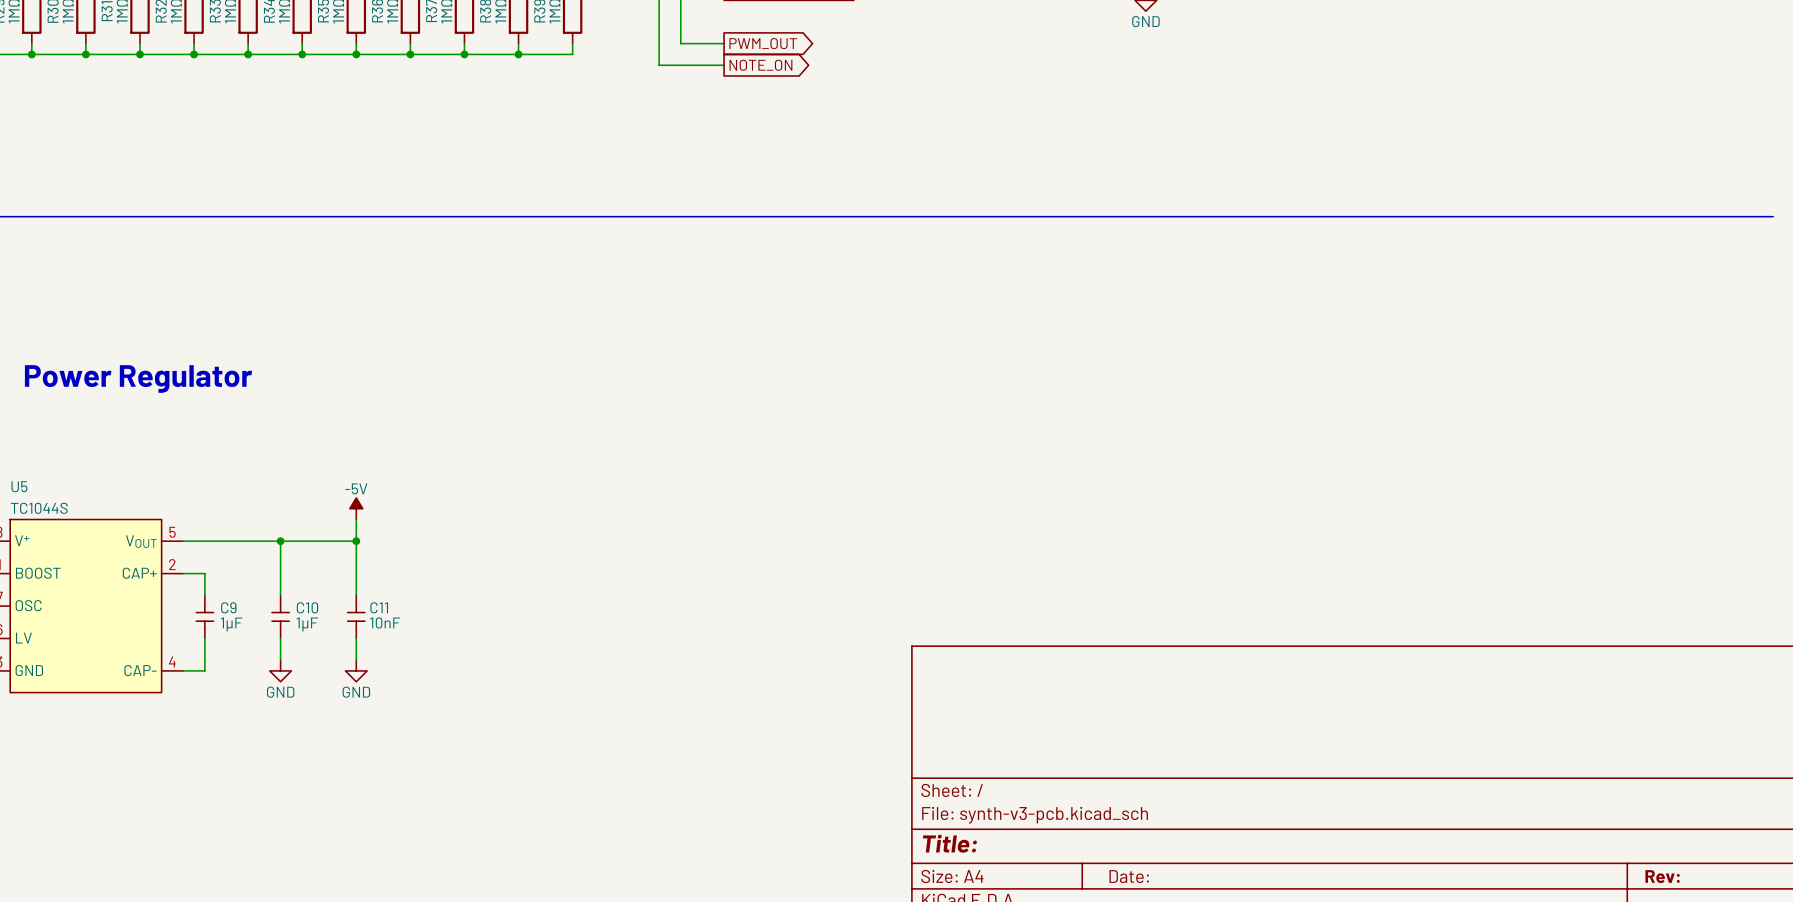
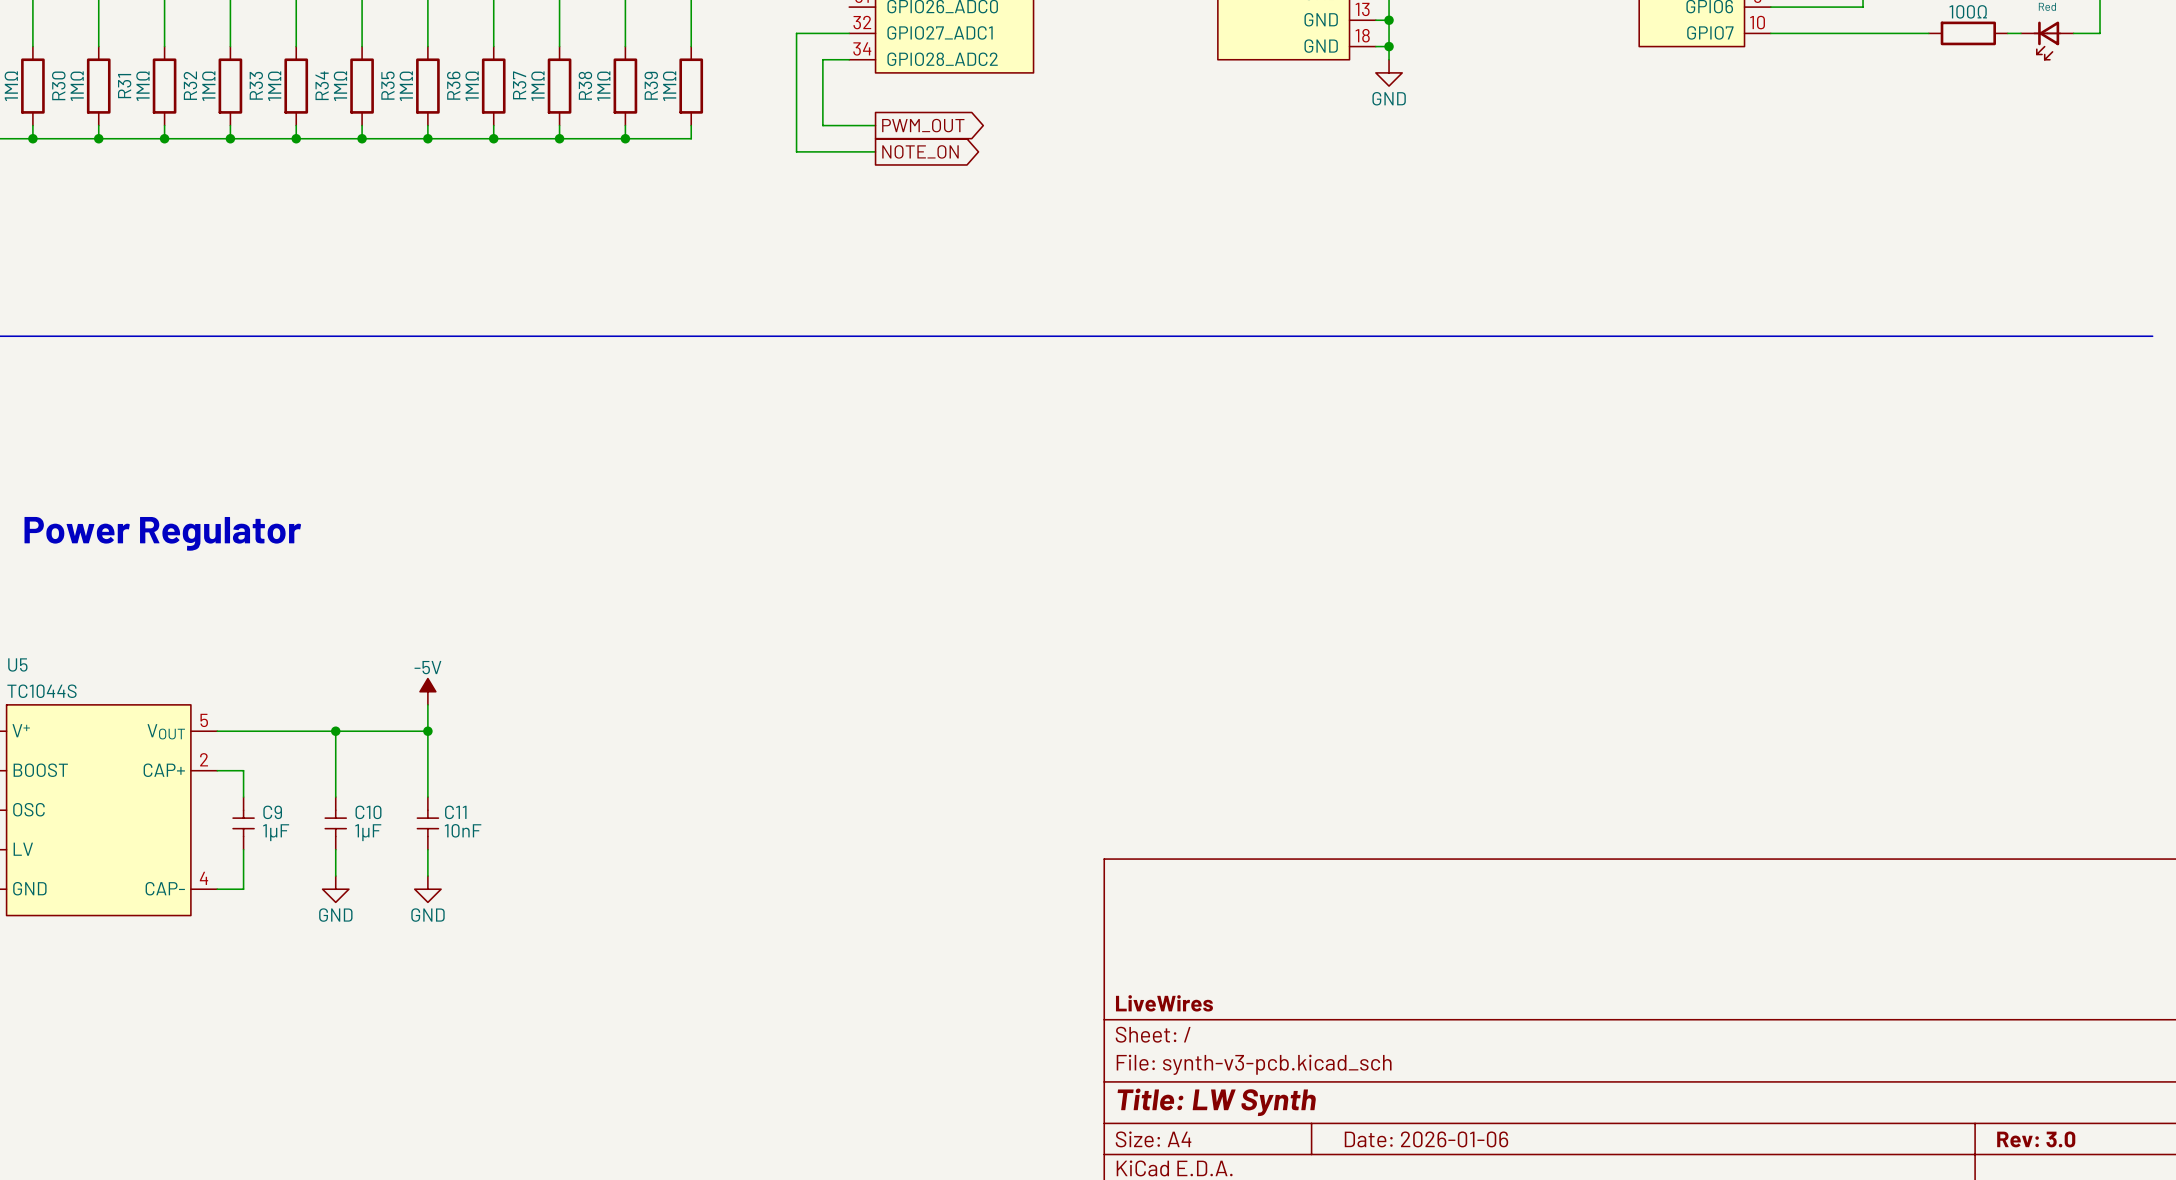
title block: none -> LiveWires (1164, 1003)
title block: Title: (949, 843) -> Title: LW Synth (1216, 1102)
title block: Date: (1129, 876) -> Date: 2026-01-06 (1426, 1139)
title block: Rev: (1662, 876) -> Rev: 3.0 (2036, 1139)

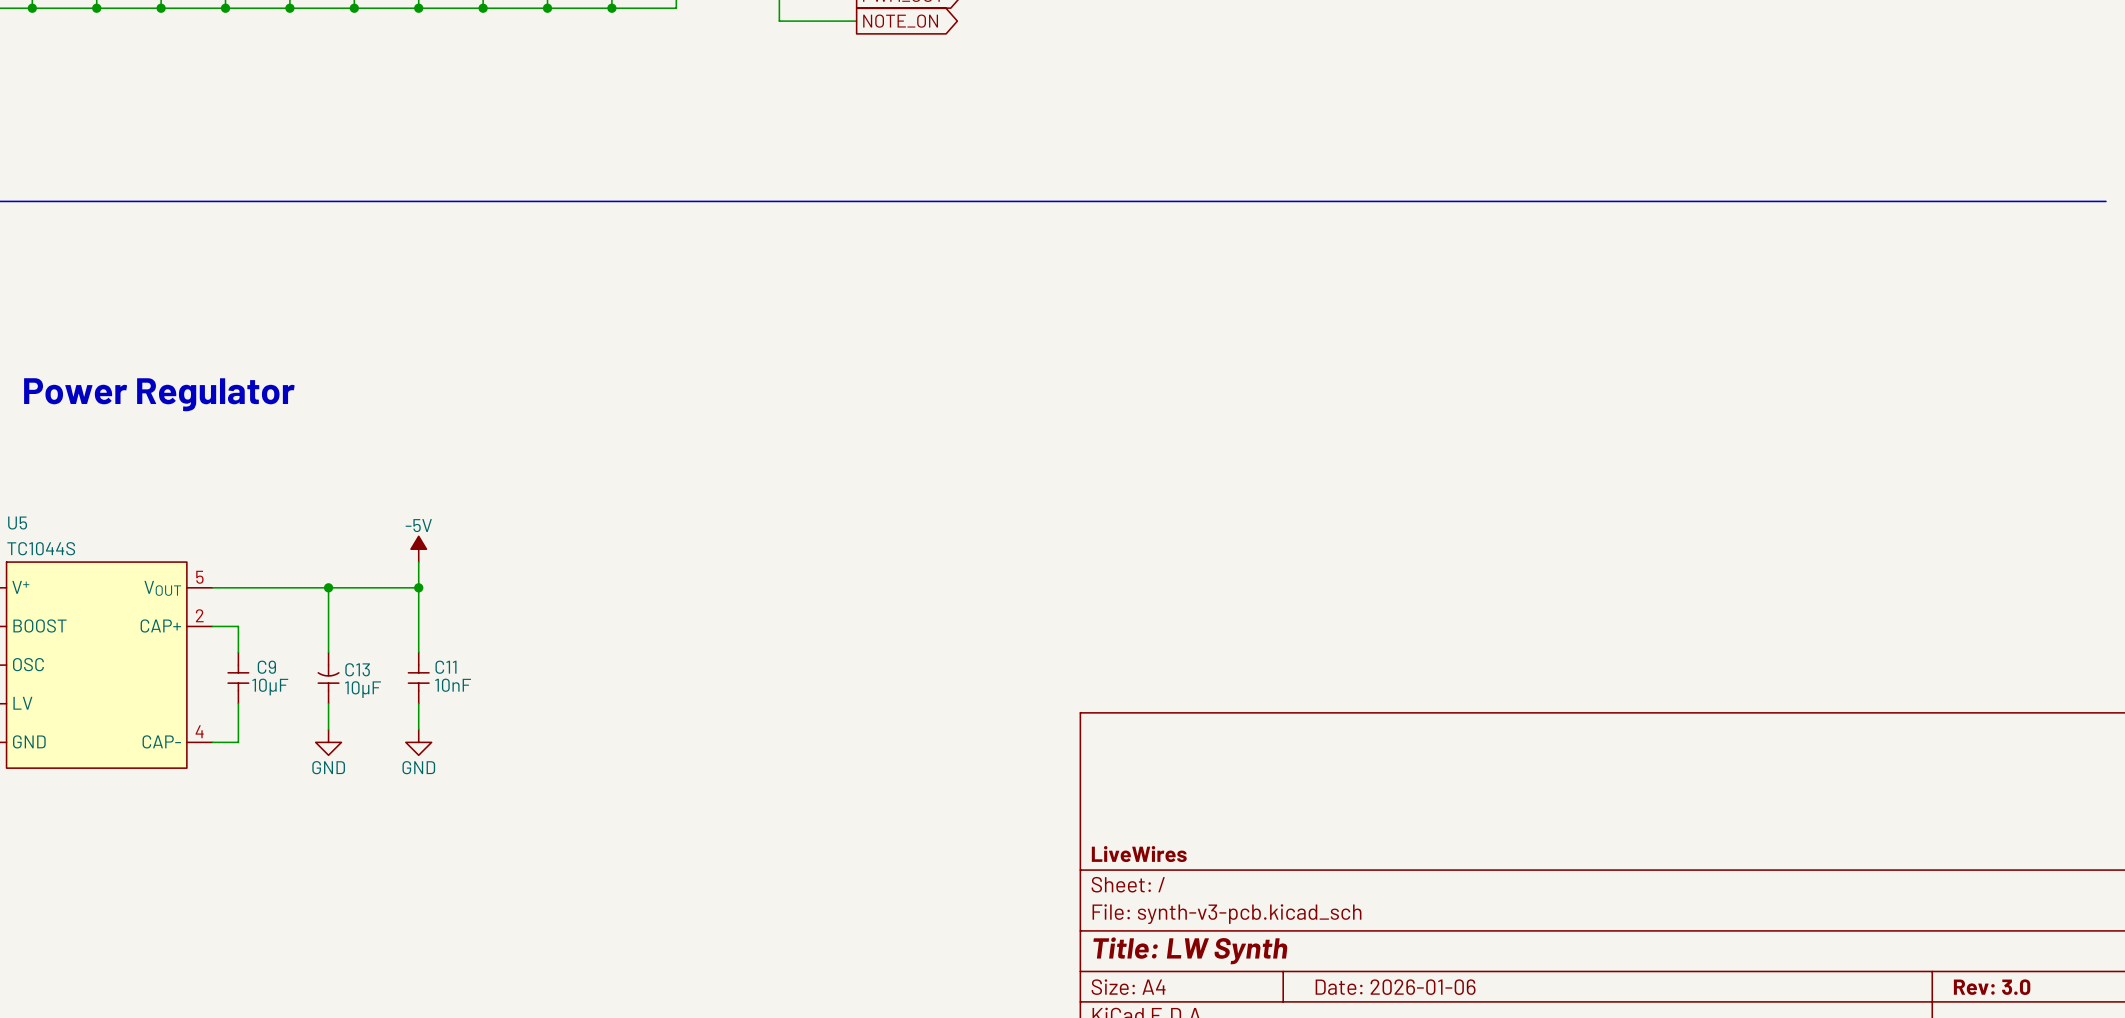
C10: 1µF (335, 823) -> none
C13: none -> 10µF (328, 677)
C9 value: 1µF (276, 832) -> 10µF (270, 686)

